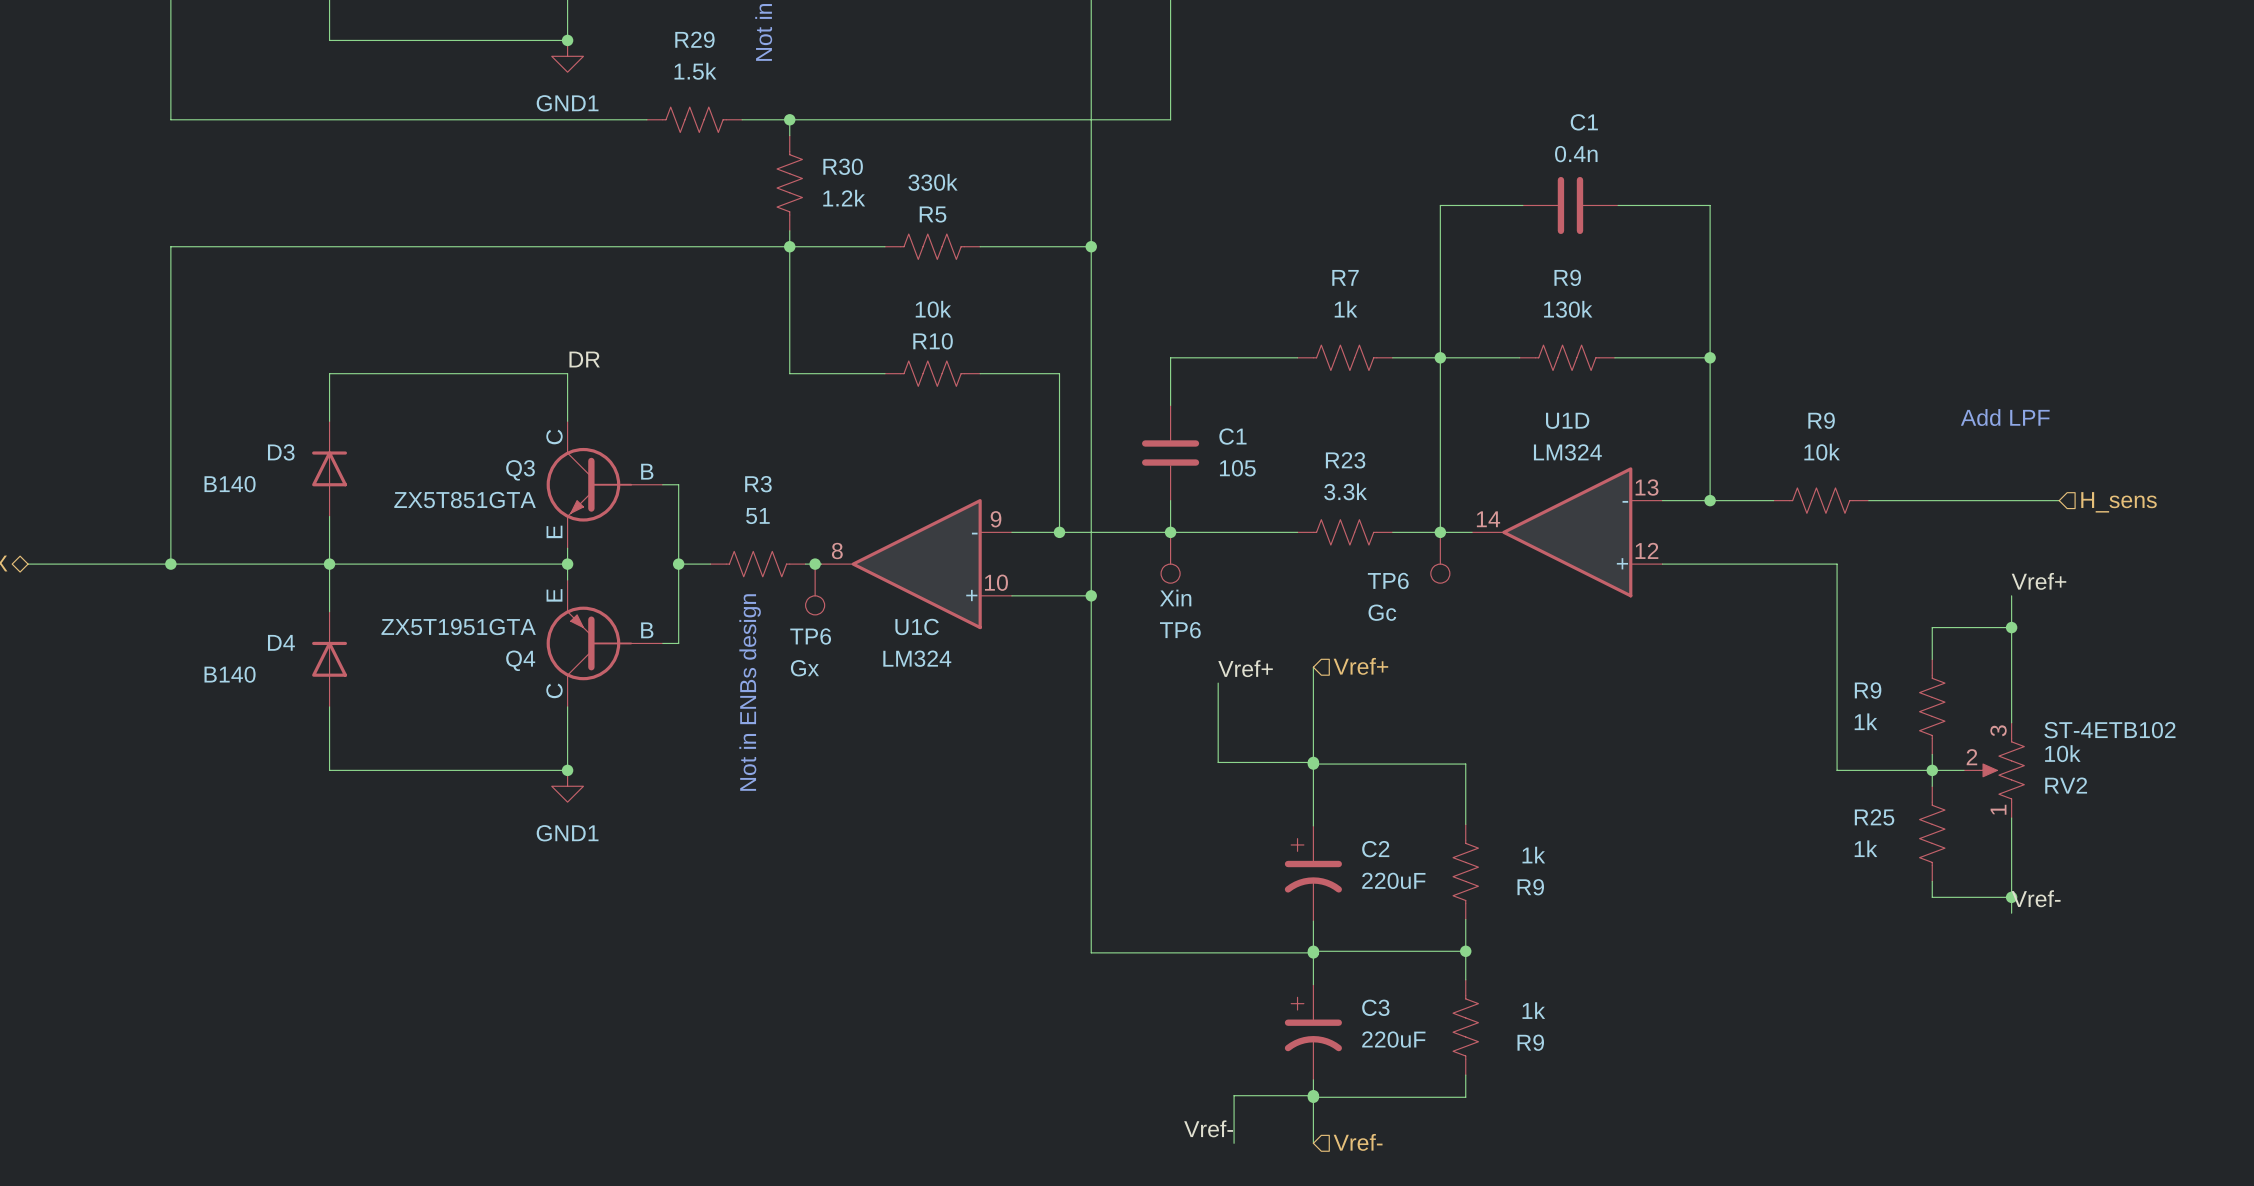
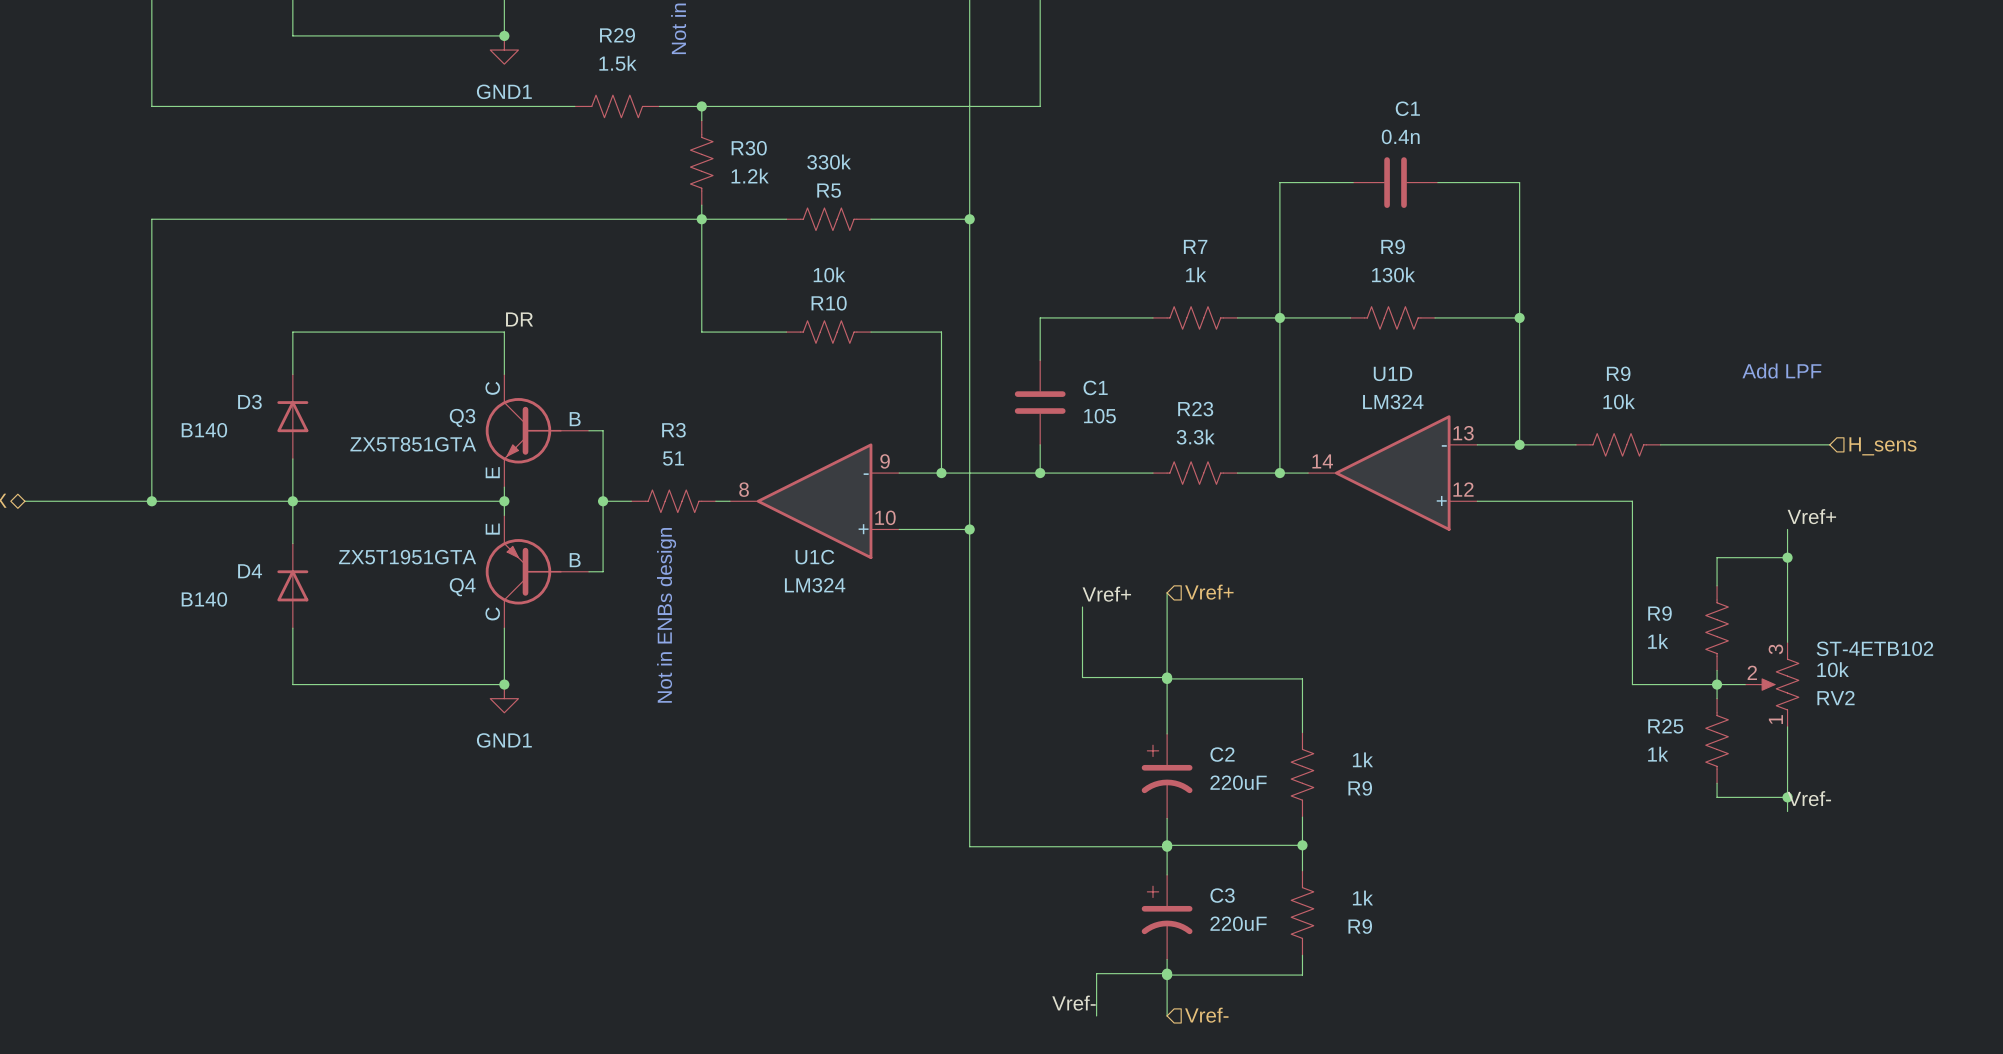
TP6: Xin (1170, 557) -> none
TP6: Gc (1440, 557) -> none
junction: (815, 564) -> none
TP6: Gx (815, 589) -> none

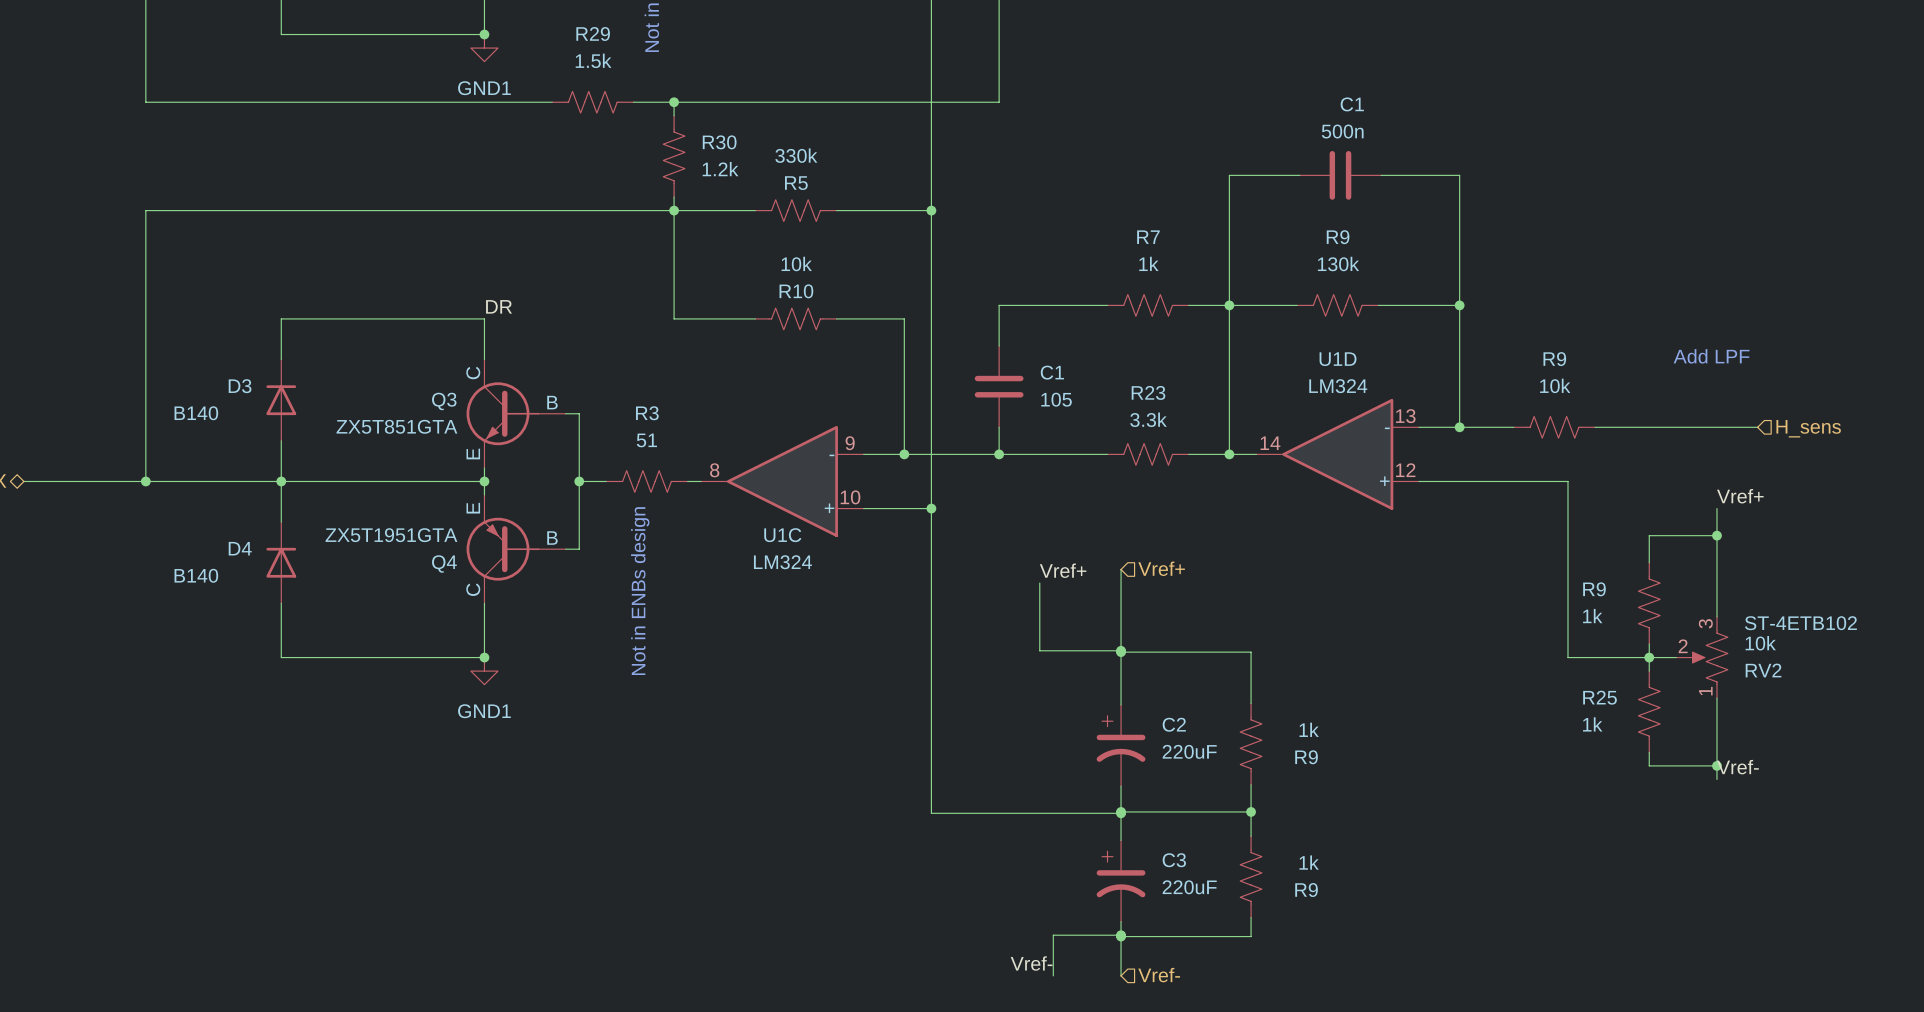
C1 value: 0.4n (1400, 136) -> 500n (1342, 131)

